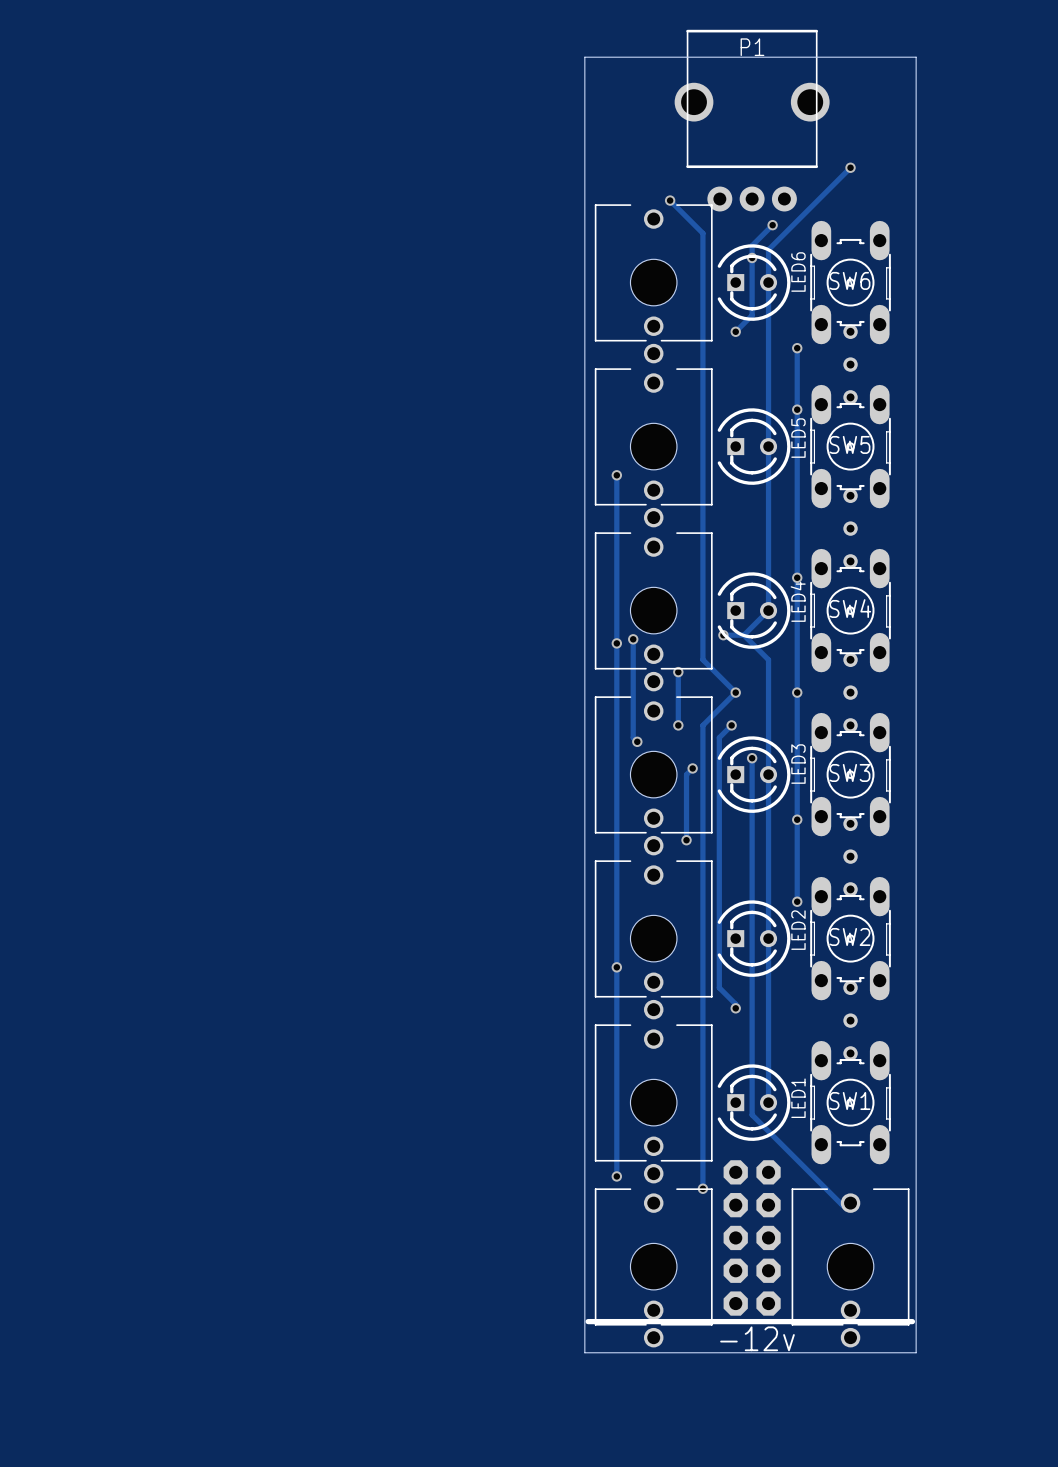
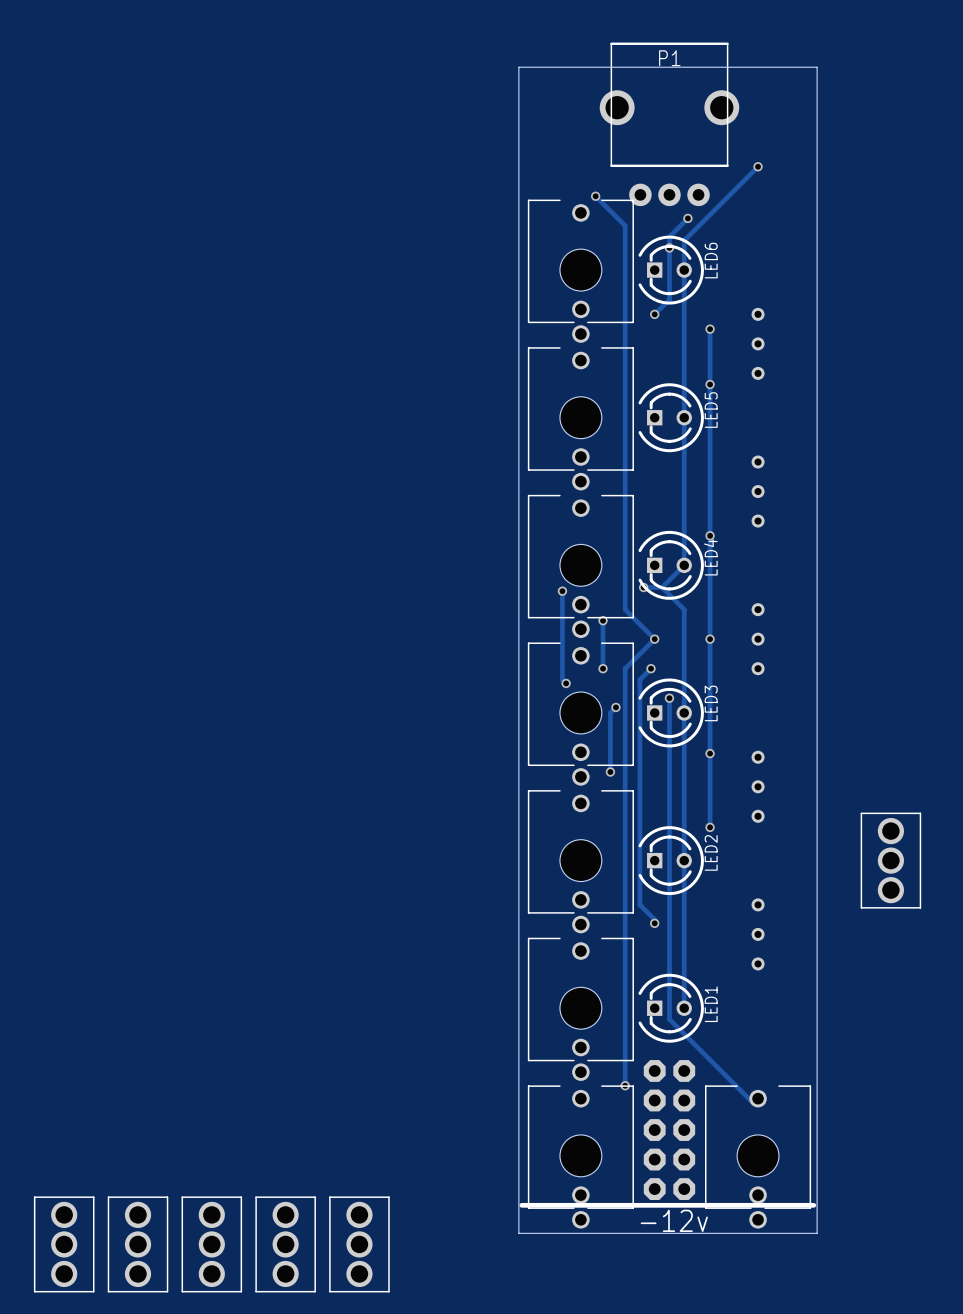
SW6: (850, 282) -> none
SW5: (850, 446) -> none
track: (616, 475) (616, 1176) -> none
via: (616, 475) -> none
SW4: (850, 610) -> none
via: (616, 643) -> none
SW3: (850, 774) -> none
SW2: (850, 938) -> none
part: none -> (890, 860)
via: (616, 967) -> none
SW1: (850, 1102) -> none
via: (616, 1176) -> none
part: none -> (64, 1244)
part: none -> (138, 1244)
part: none -> (211, 1244)
part: none -> (285, 1244)
part: none -> (359, 1244)

